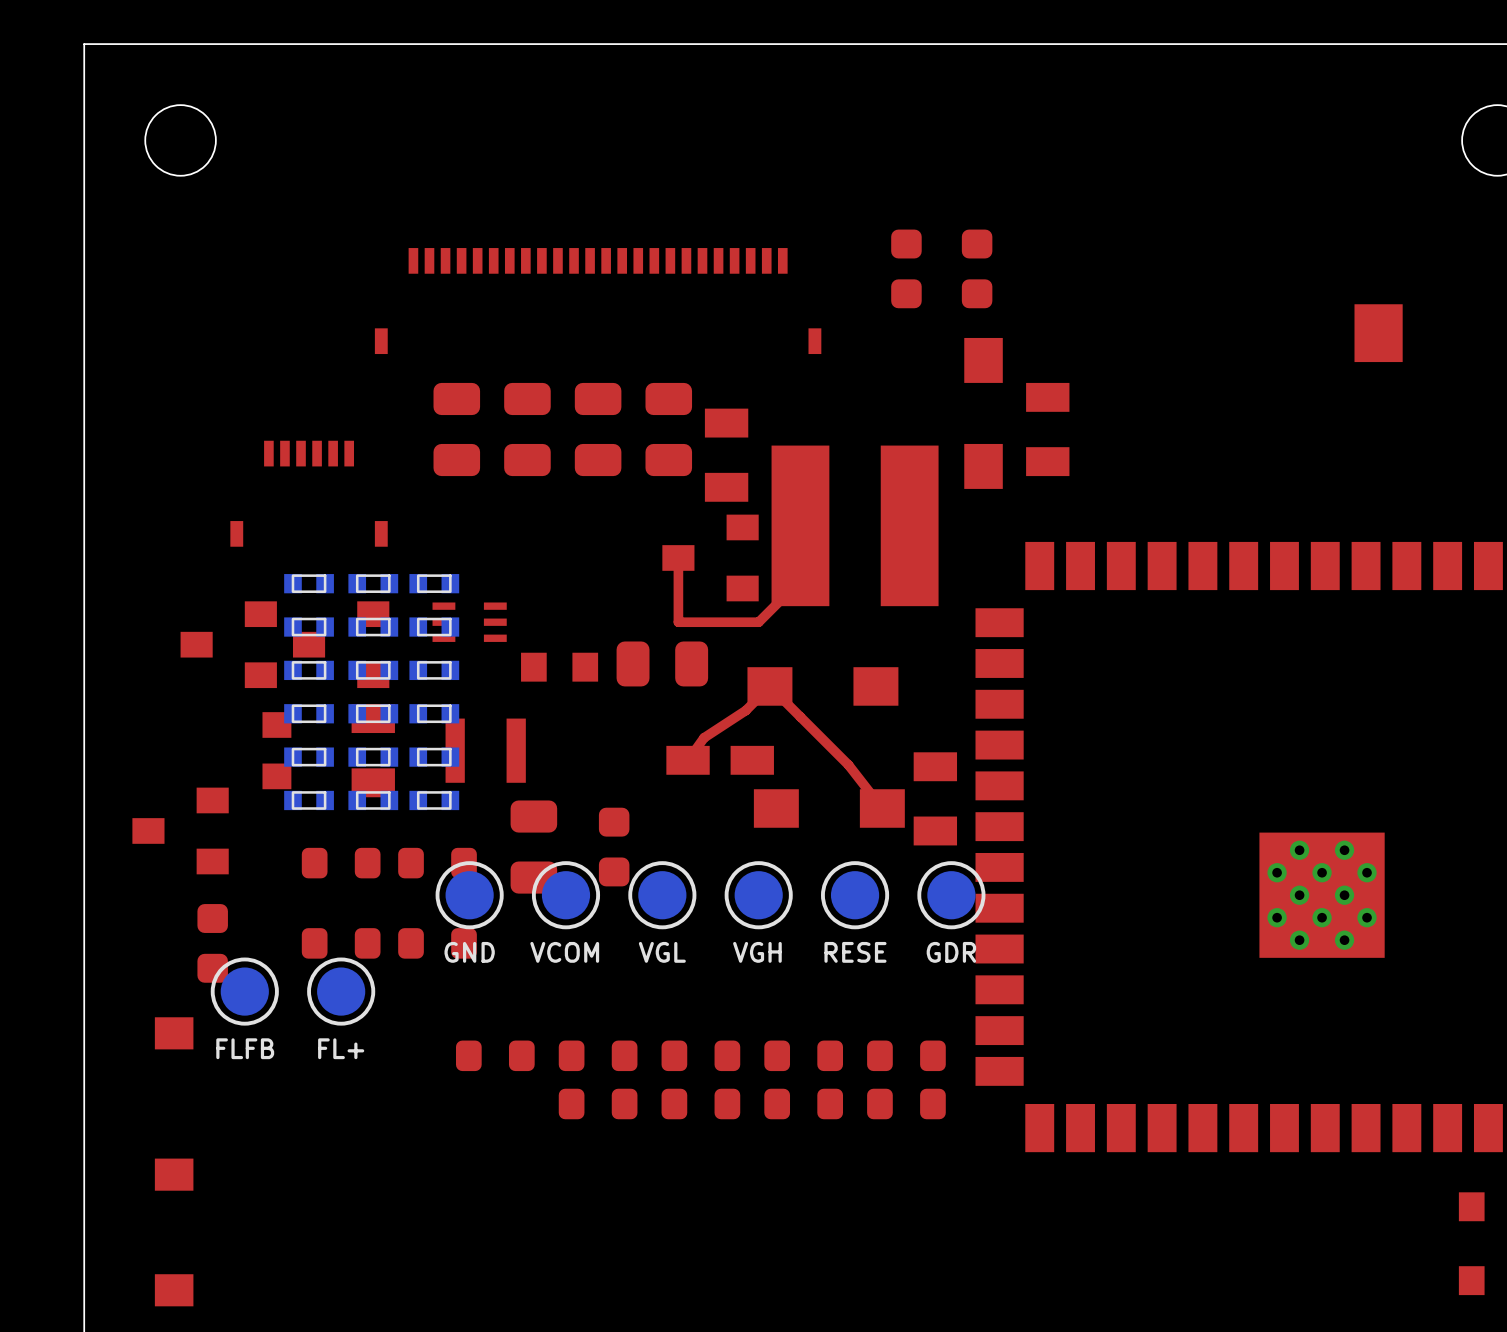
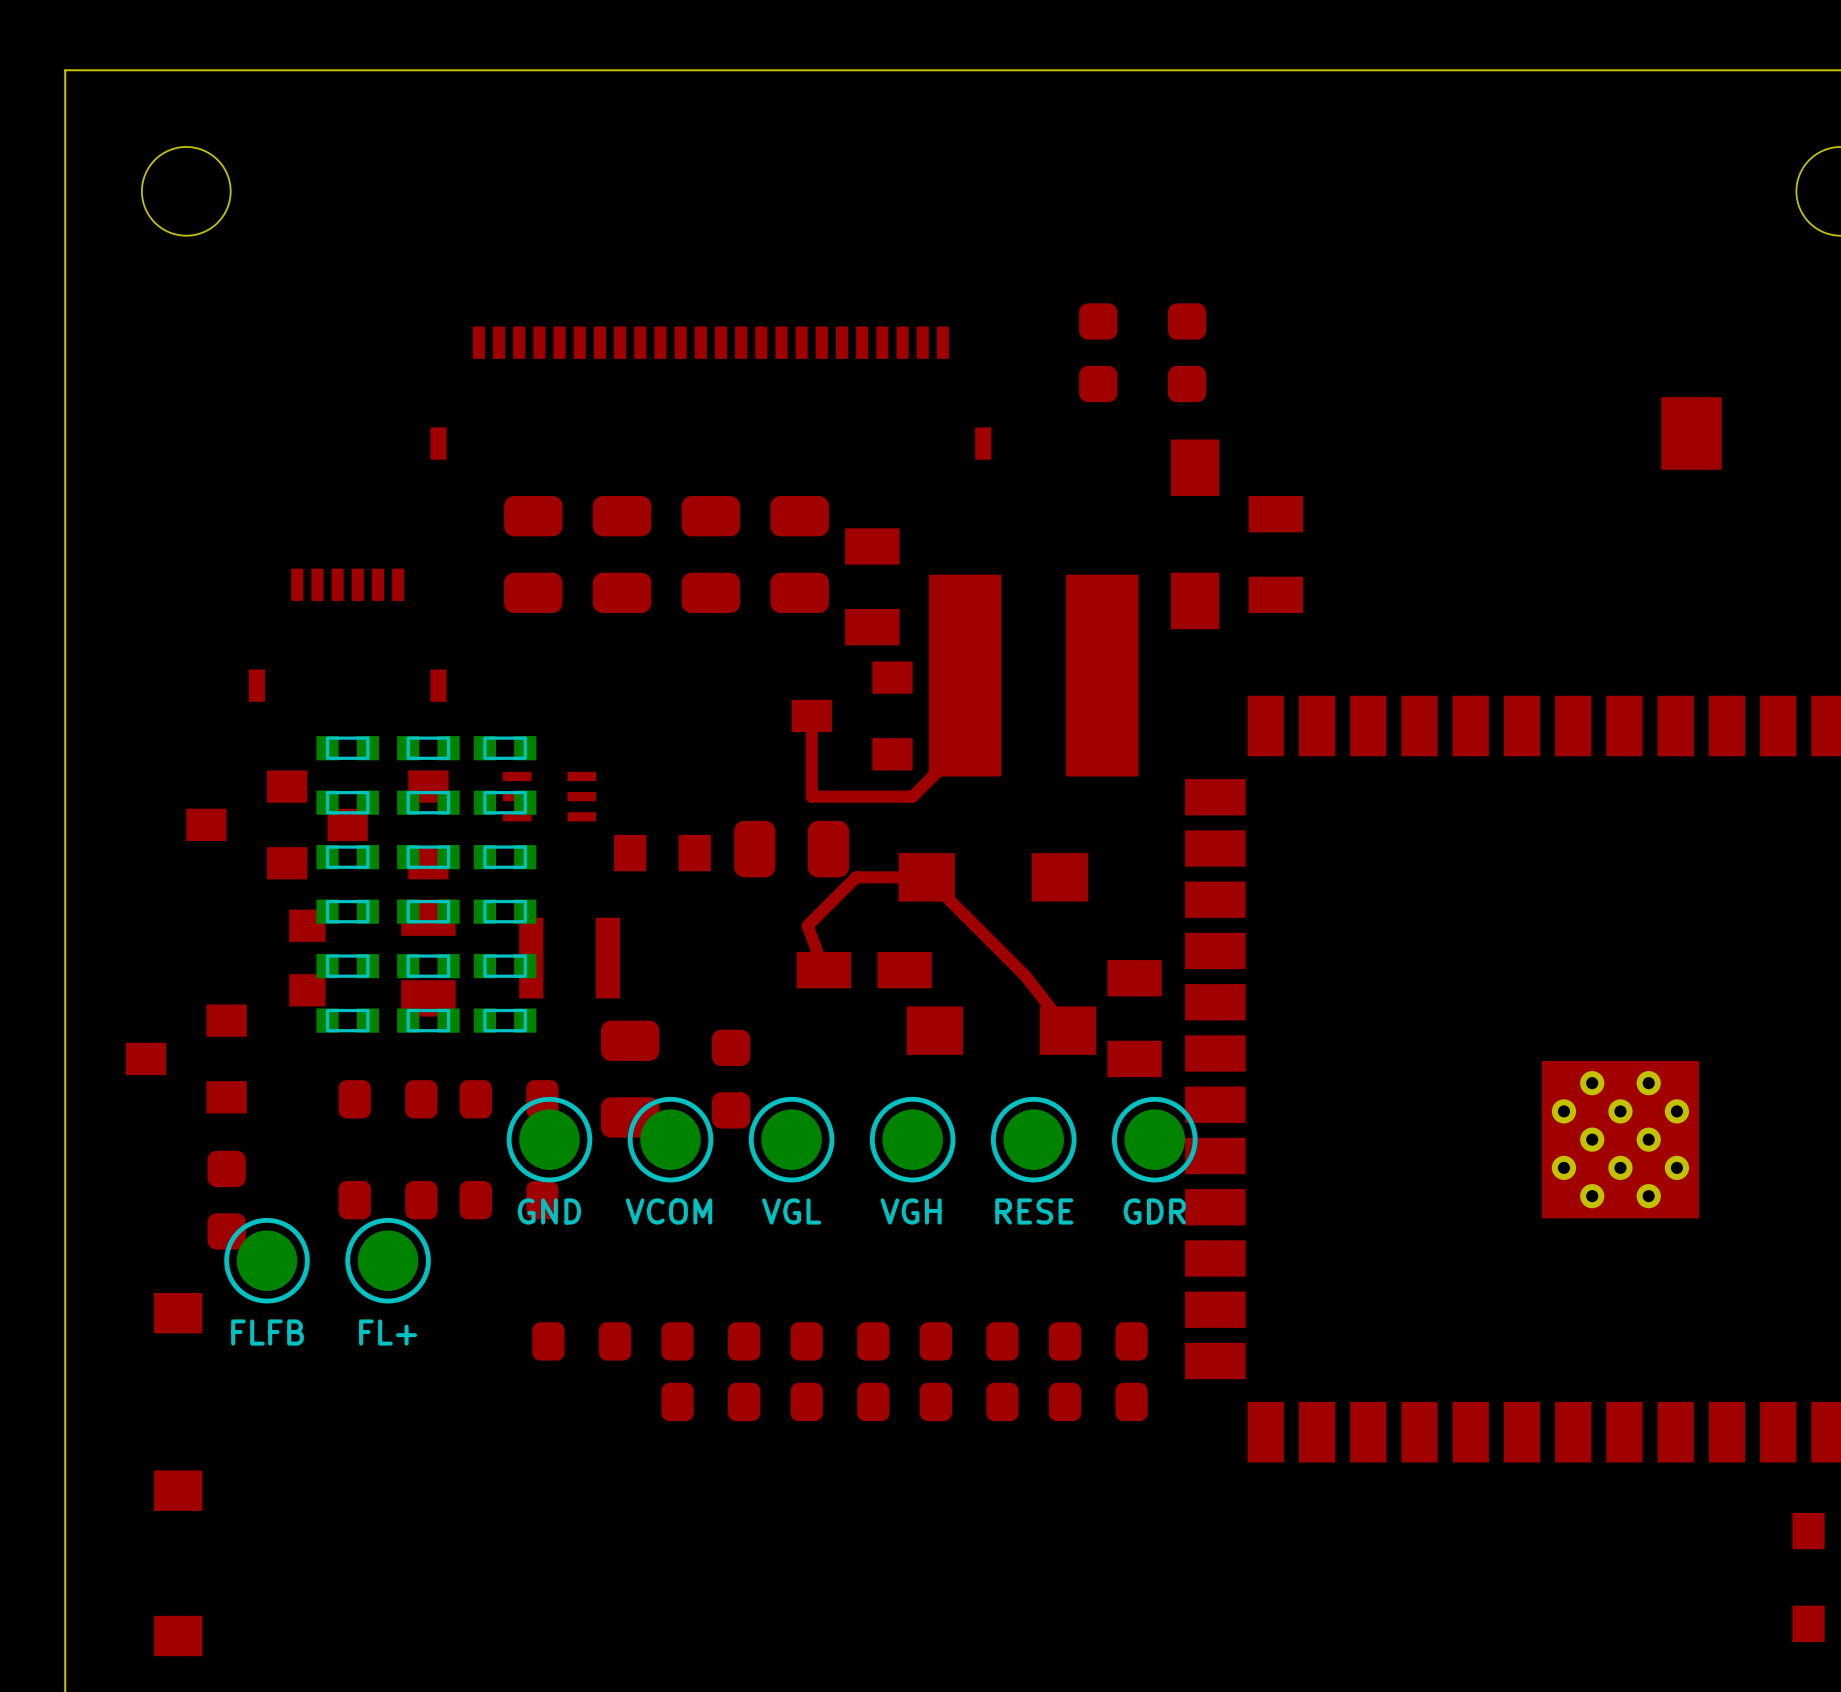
top track: (769, 686) (745, 710) (704, 737) (688, 760) -> (926, 877) (856, 877) (807, 925) (823, 970)

